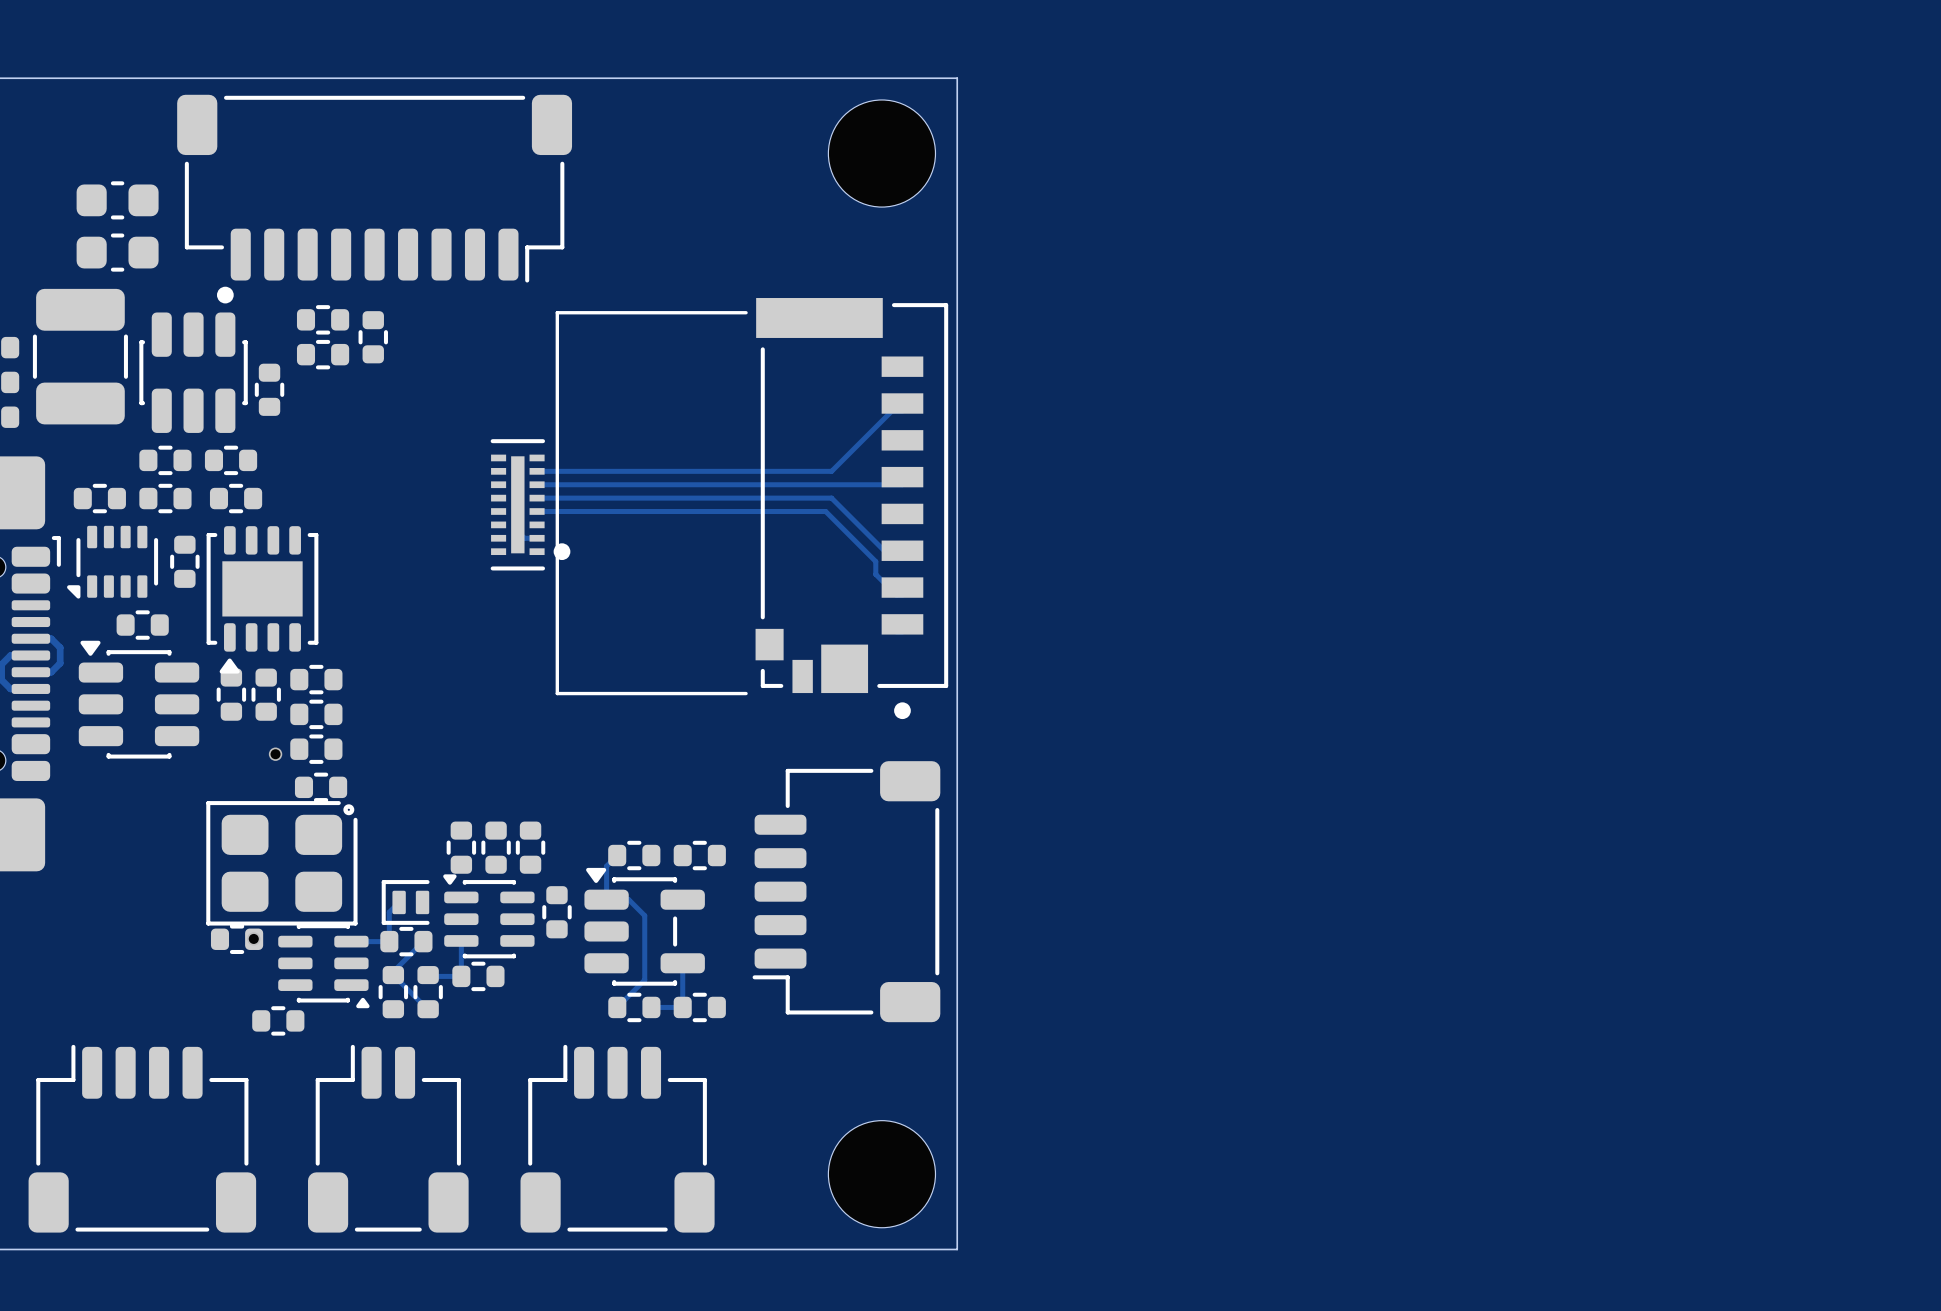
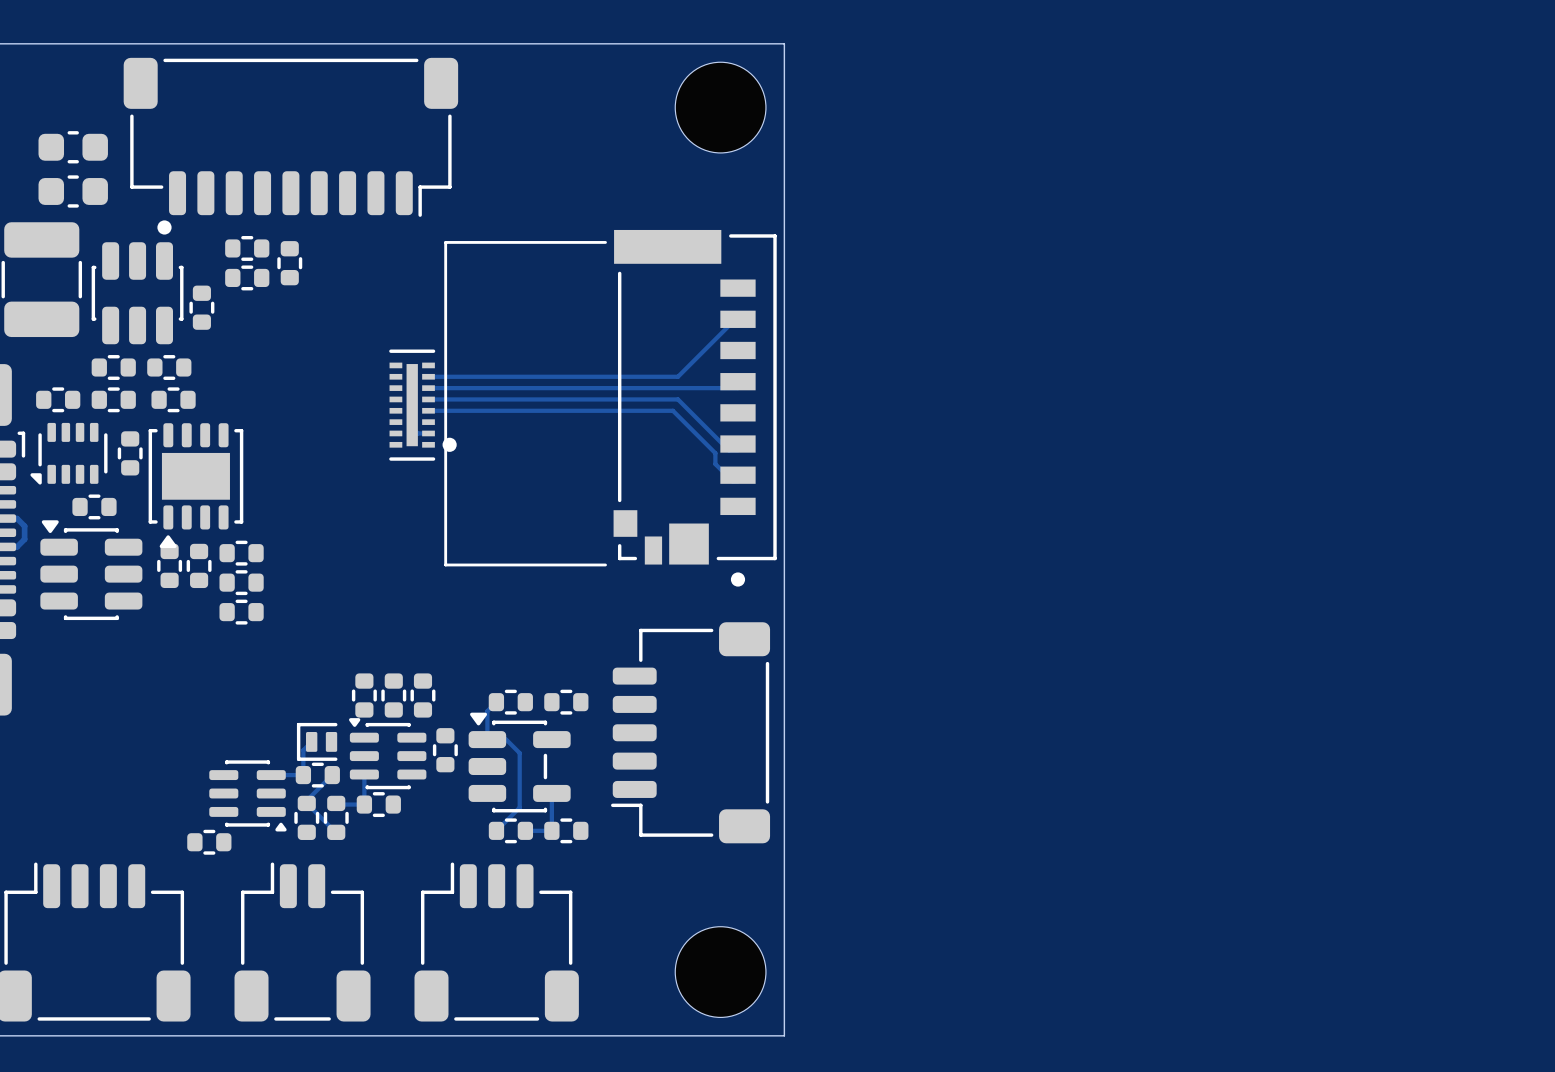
via: (275, 754) -> none
part: (321, 787) -> none
part: (281, 863) -> none
via: (253, 938) -> none
part: (237, 939) -> none

